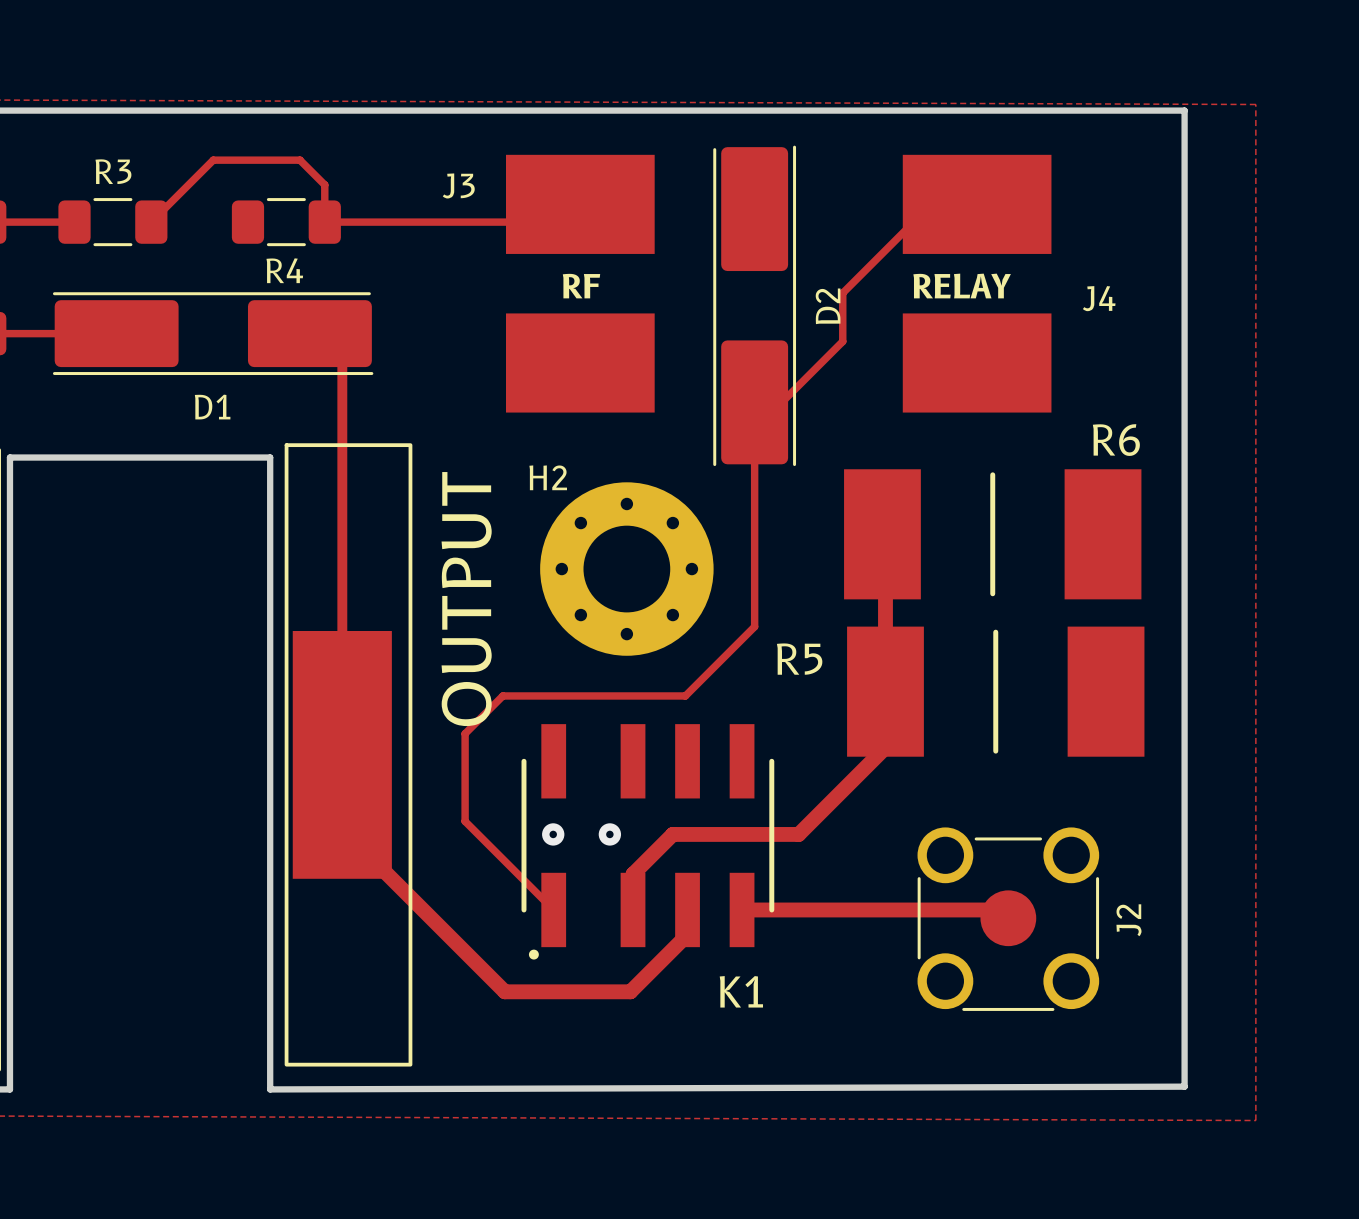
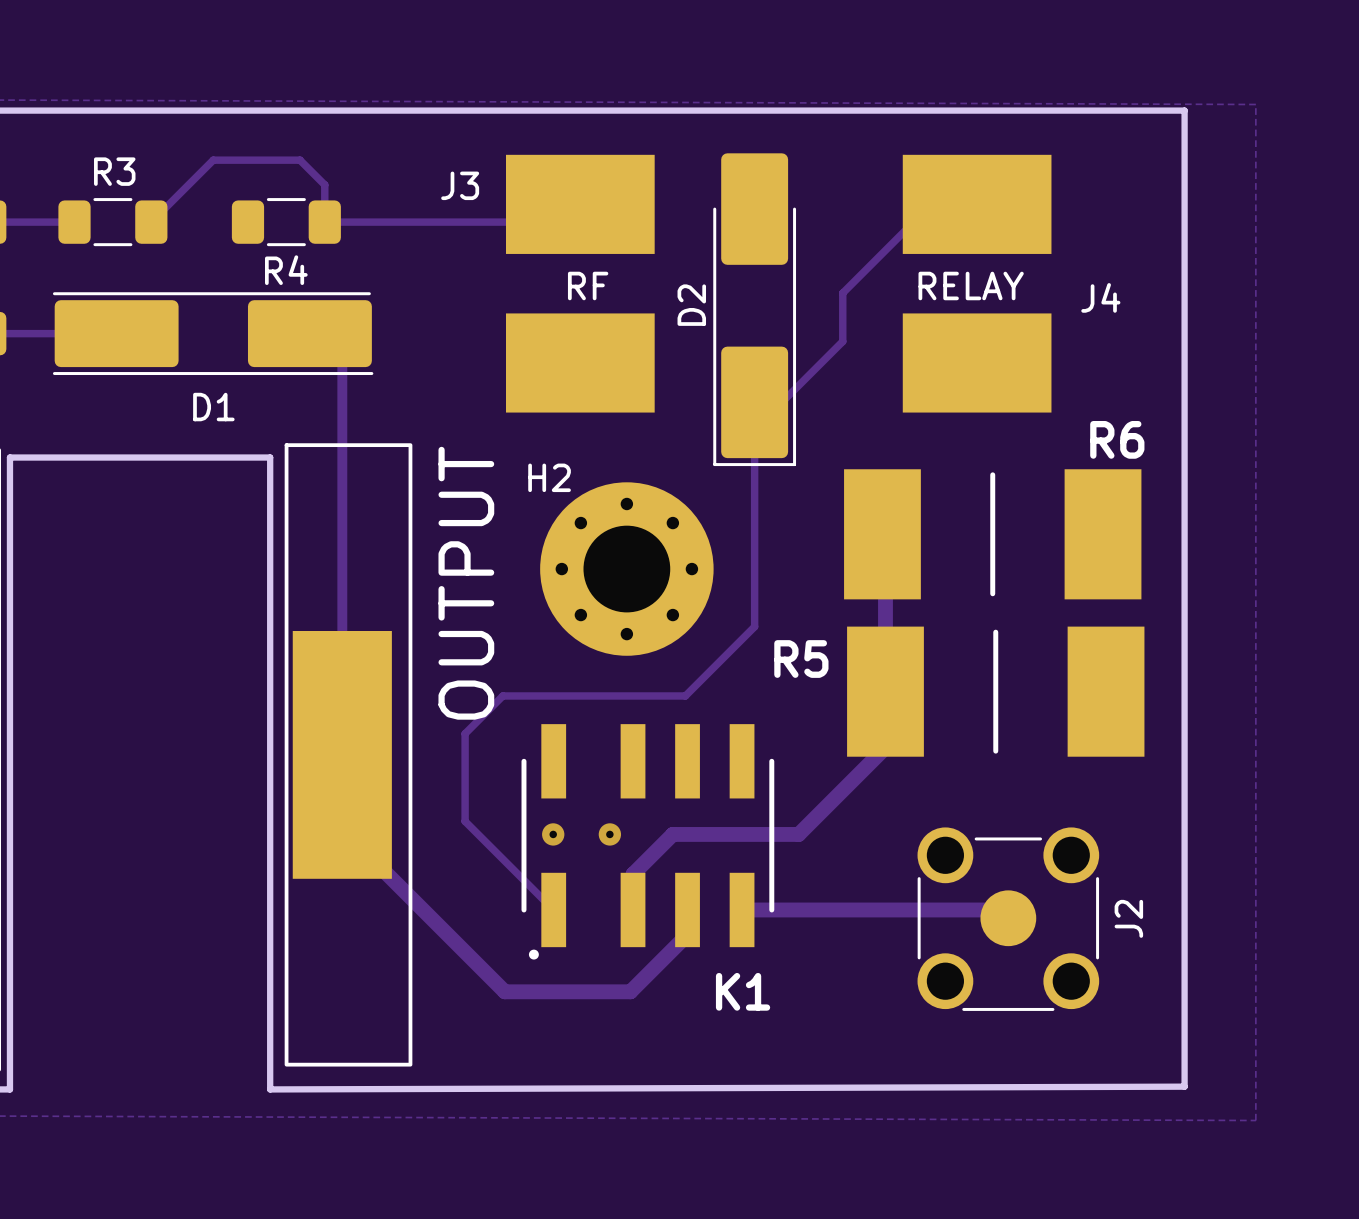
D2 footprint: [713, 145, 797, 467] -> [713, 153, 797, 467]
D2 name position: D2 (828, 306) -> D2 (691, 305)

